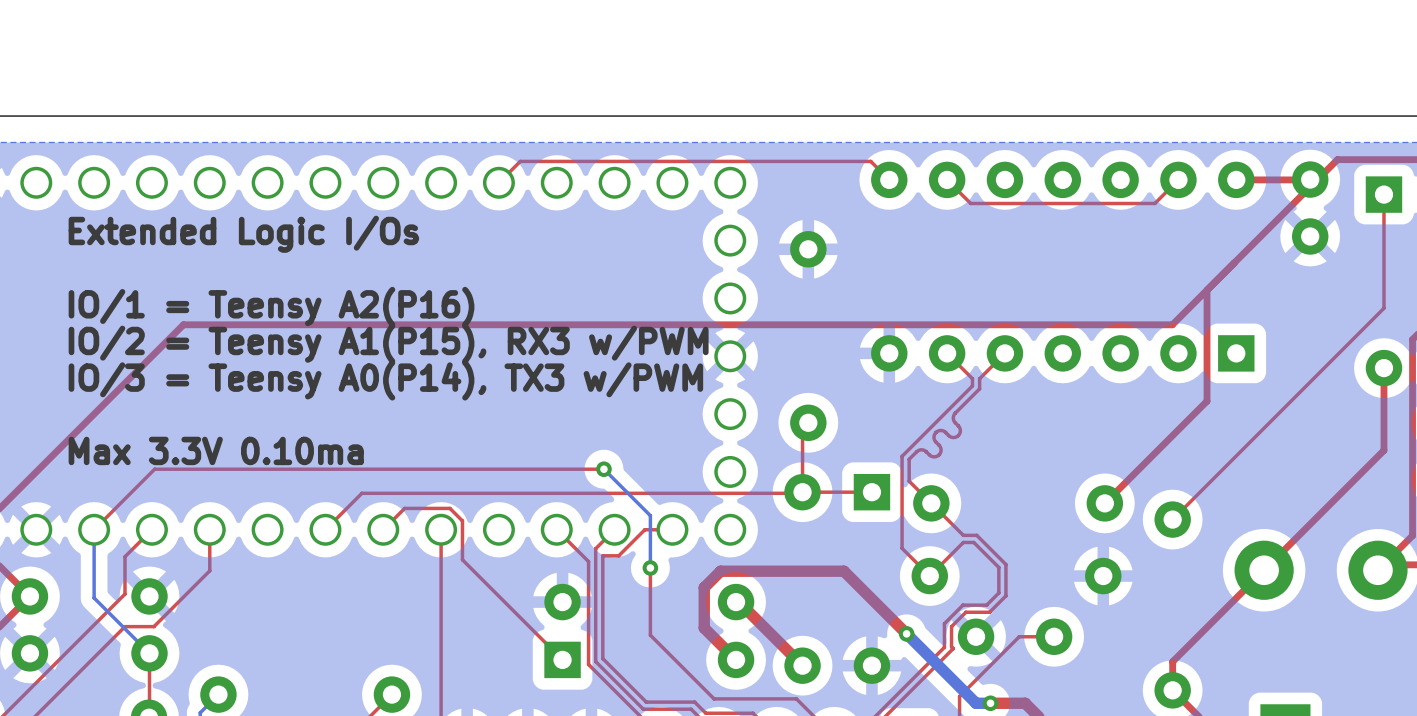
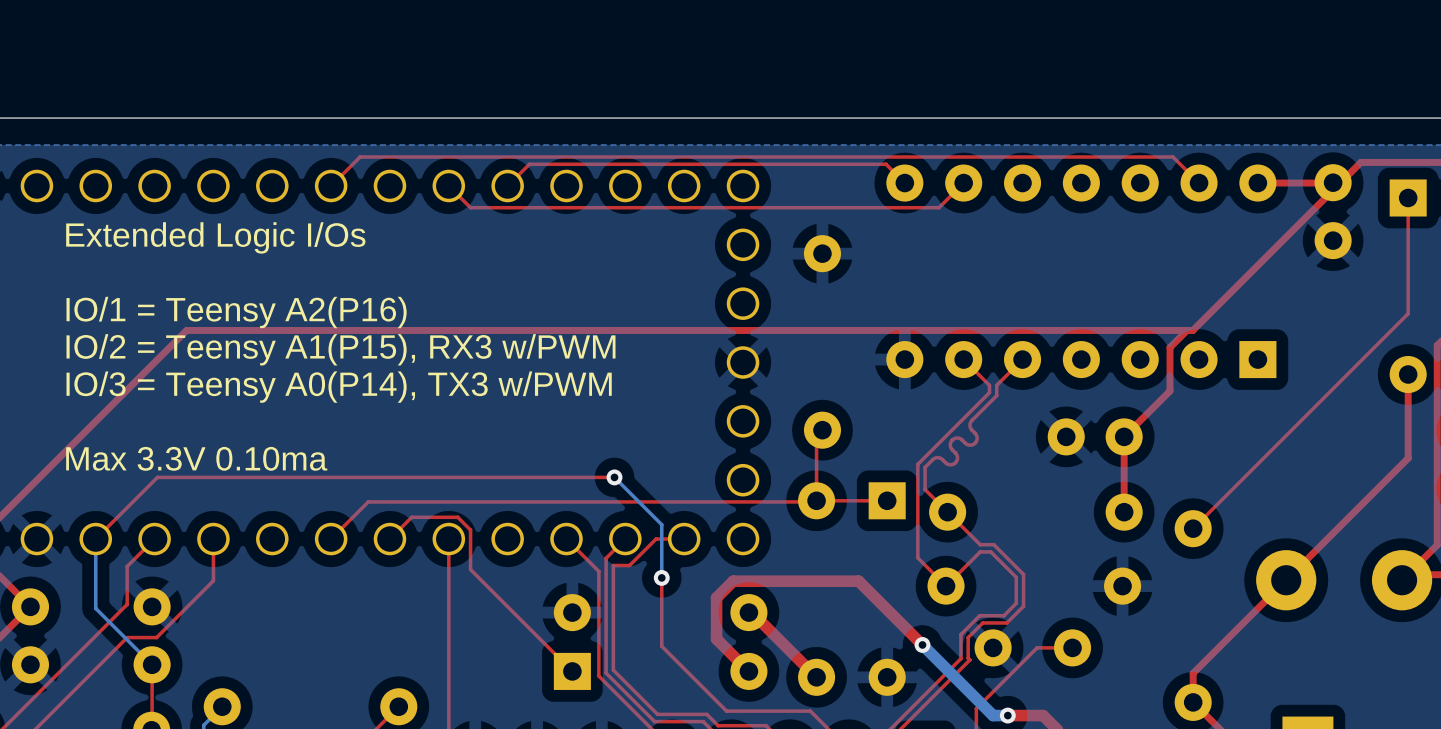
top track: none -> (963, 183) (939, 207) (470, 207) (448, 185)
top track: (1178, 179) (1154, 203) (970, 203) (952, 184) -> (1199, 183) (1173, 157) (360, 157) (331, 185)
top track: (1207, 290) (1207, 401) (1104, 503) -> (1187, 330) (1169, 347) (1169, 391) (1124, 436) (1124, 512)
part: none -> (1095, 436)

